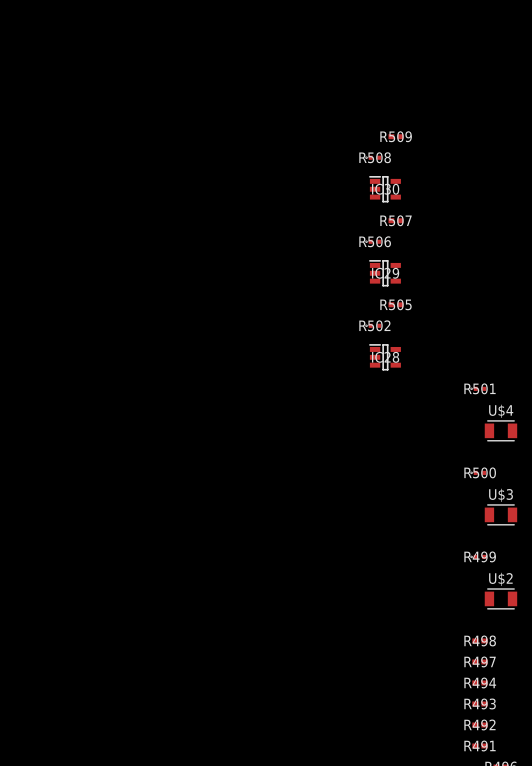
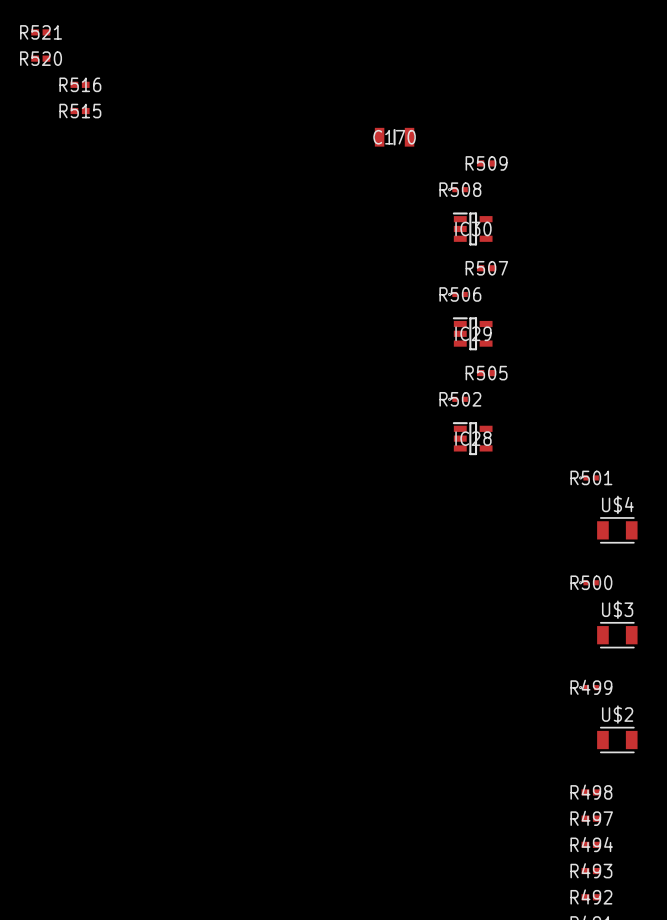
R521: none -> (40, 32)
R520: none -> (40, 58)
R516: none -> (80, 84)
R515: none -> (80, 111)
C170: none -> (394, 137)

